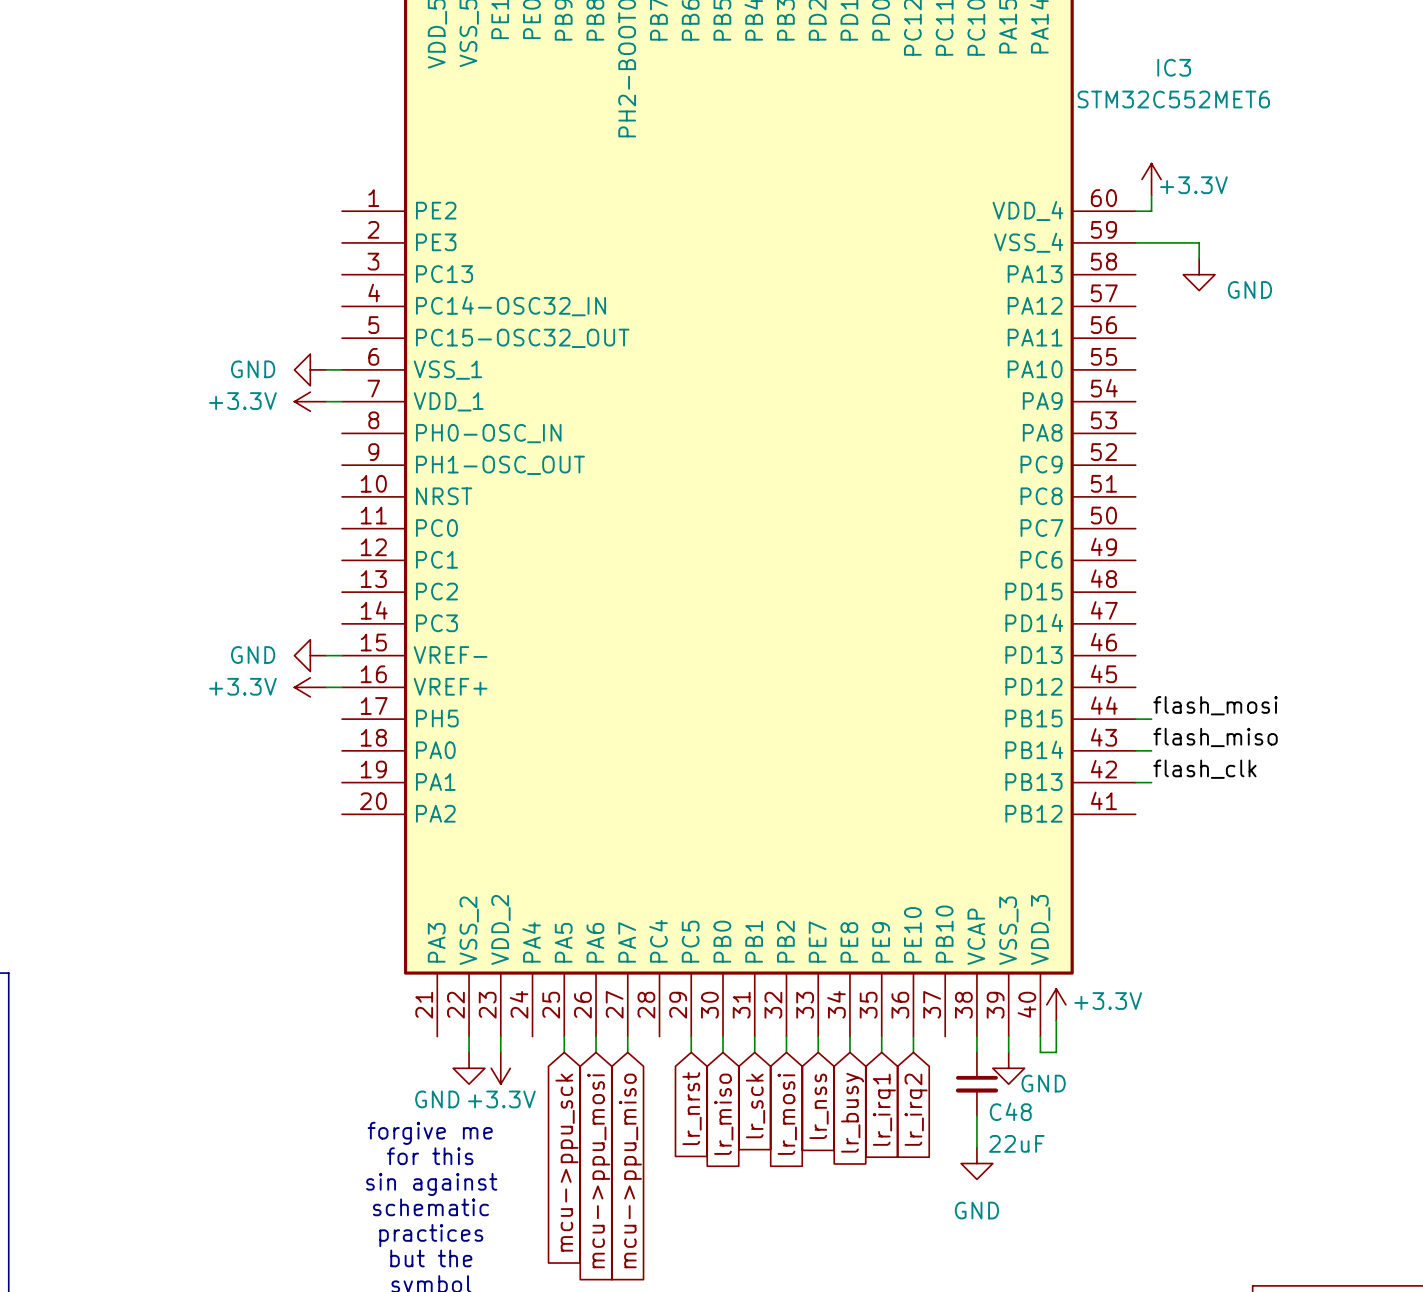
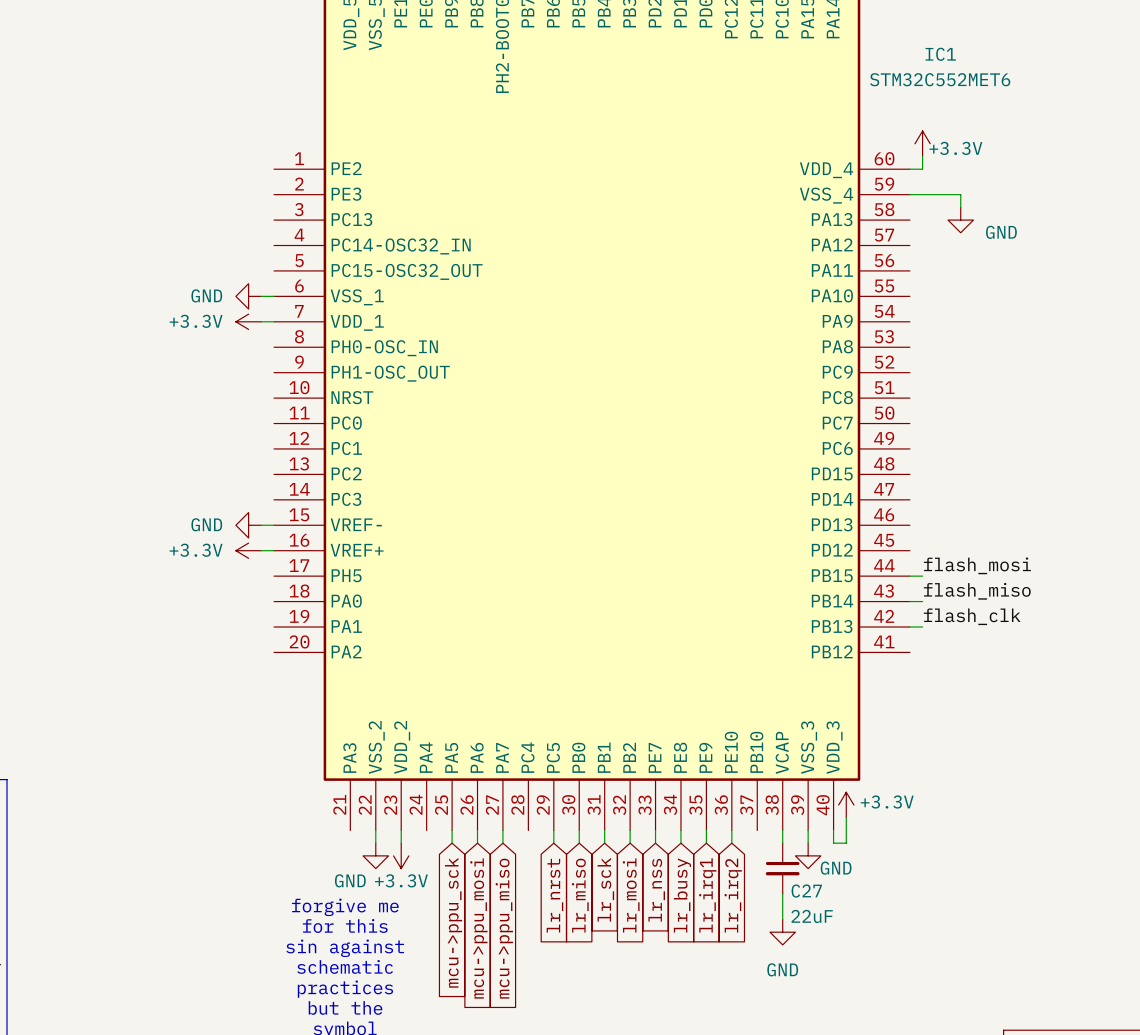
IC3 name: IC3 (1174, 67) -> IC1 (940, 54)
C48 name: C48 (1010, 1111) -> C27 (806, 891)

